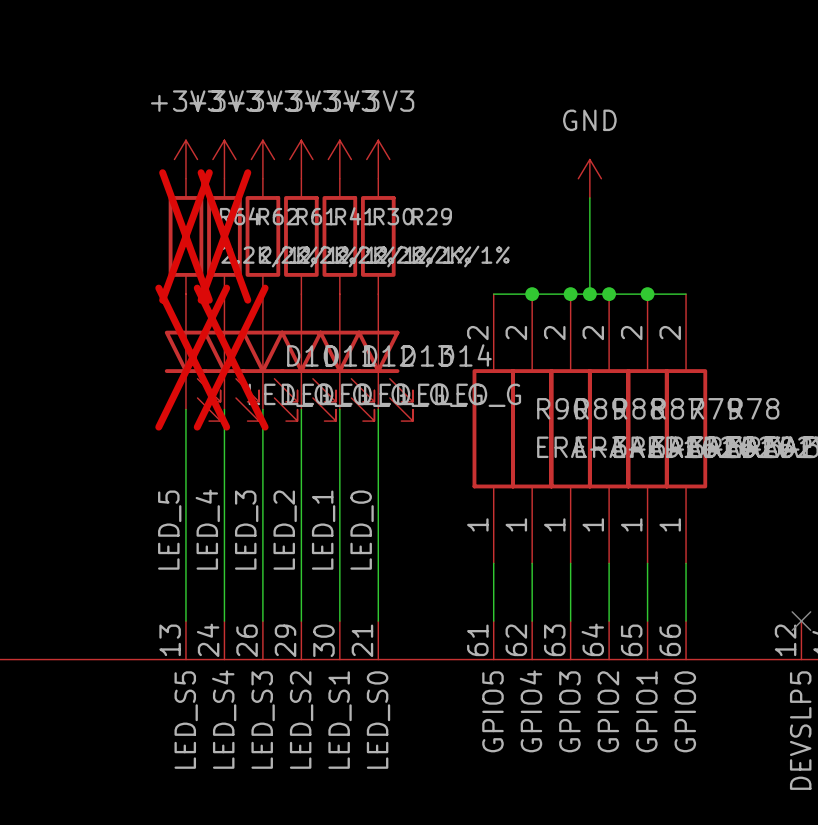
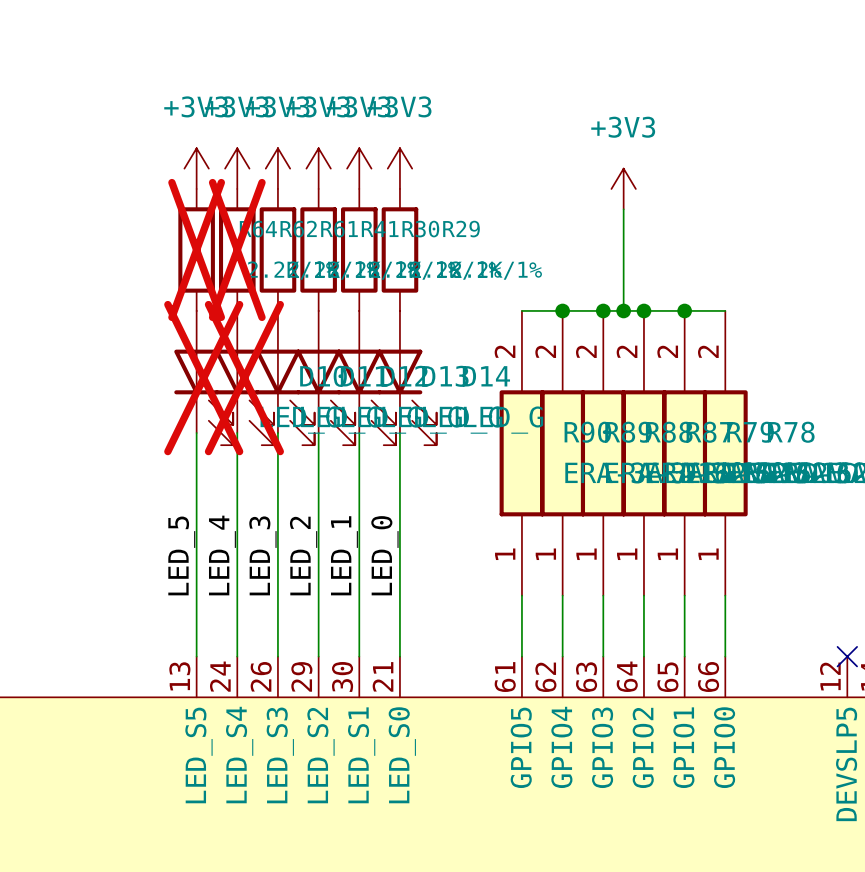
power symbol: GND (589, 178) -> +3V3 (623, 188)

